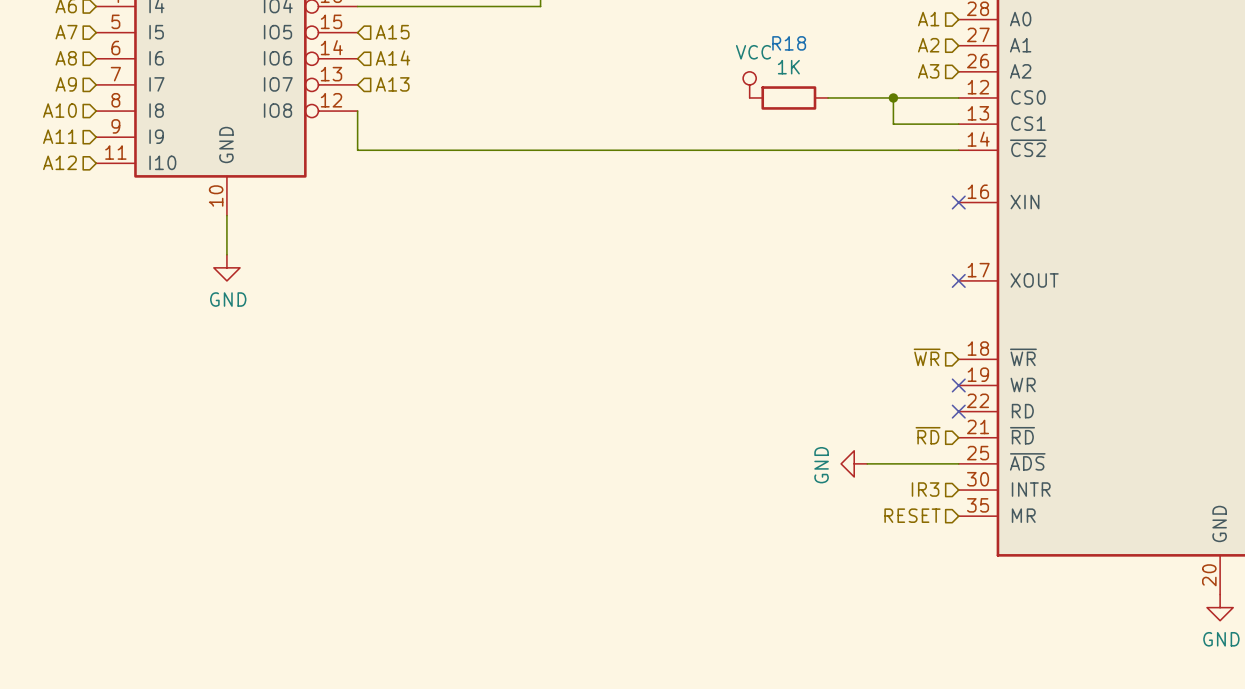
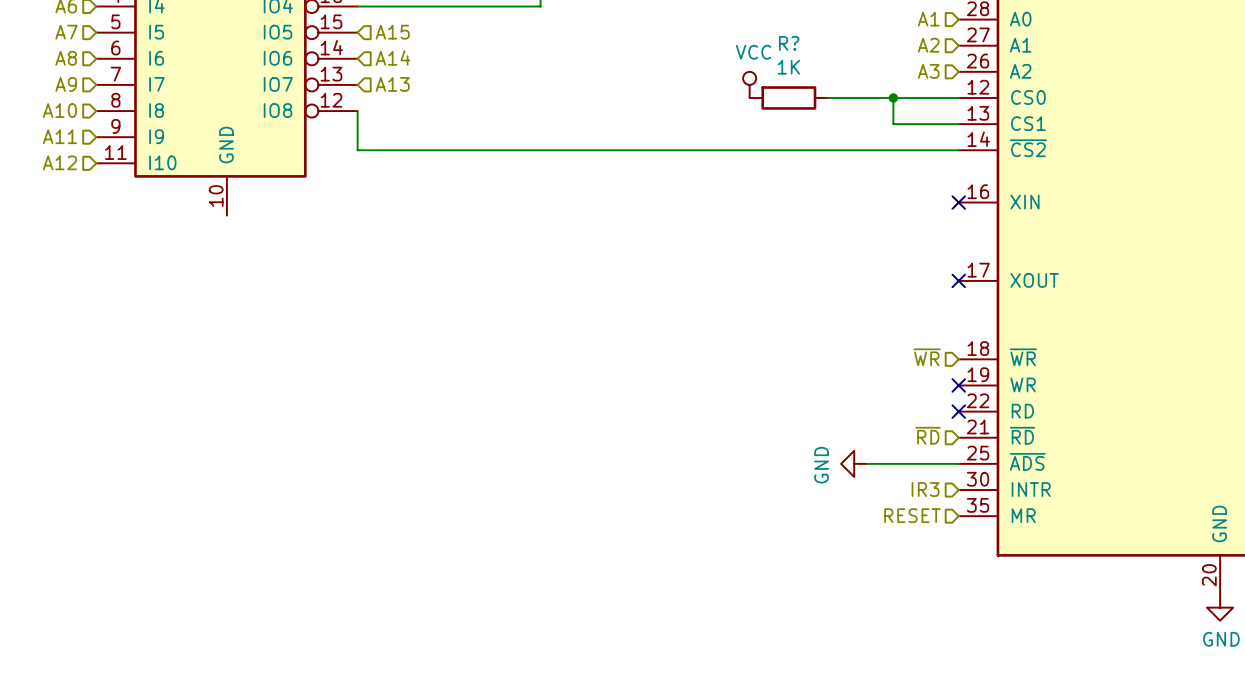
R18 name: R18 (789, 43) -> R? (789, 43)
wire: (226, 215) (226, 254) -> none
power symbol: GND (226, 267) -> none

